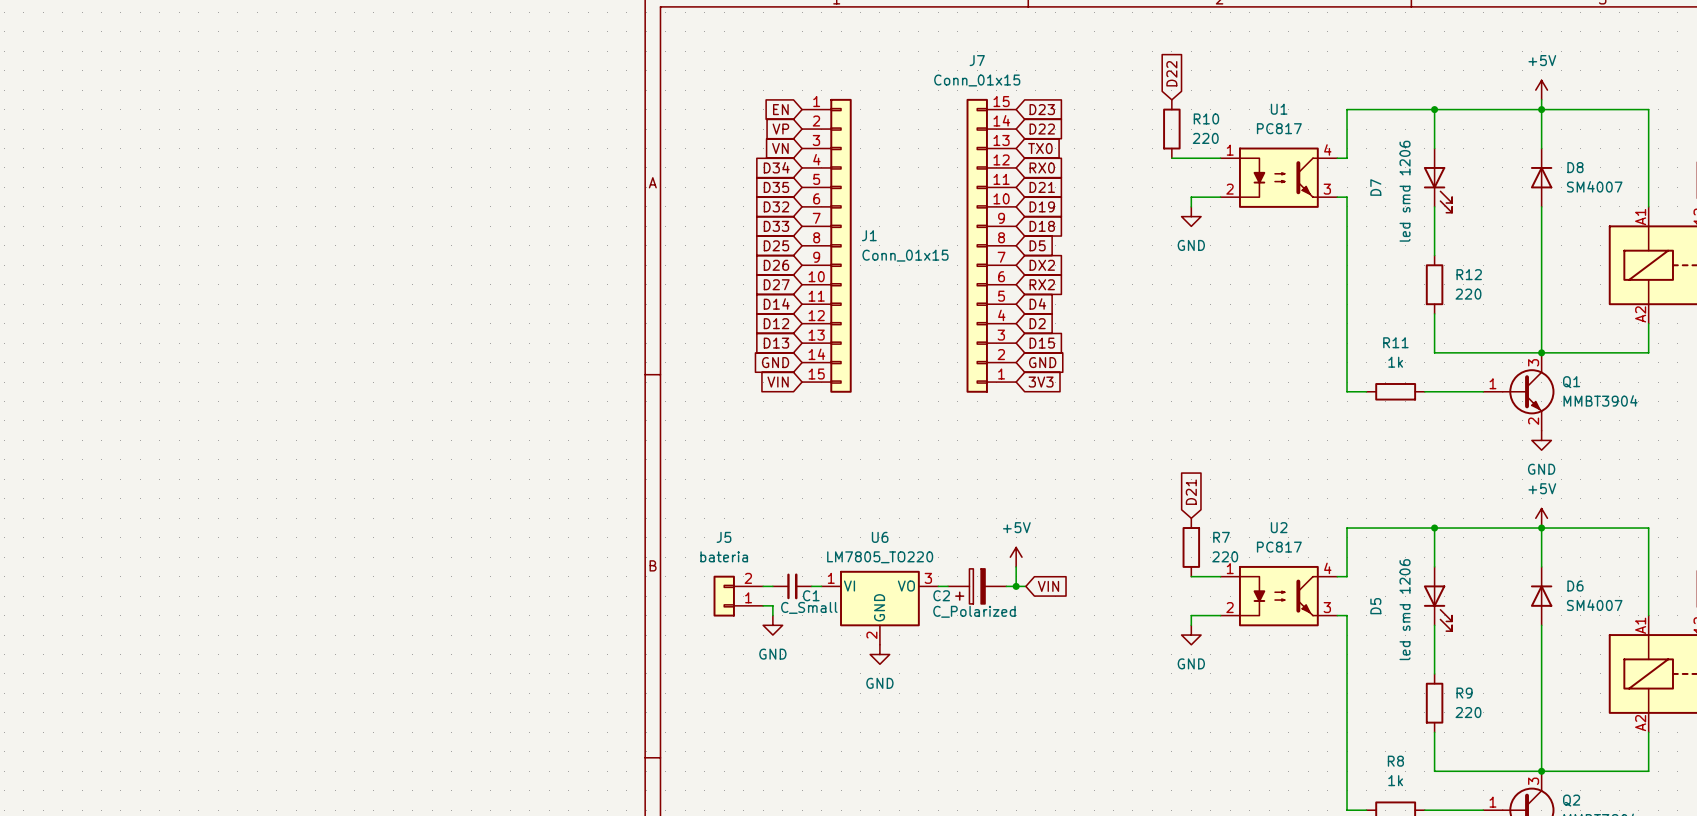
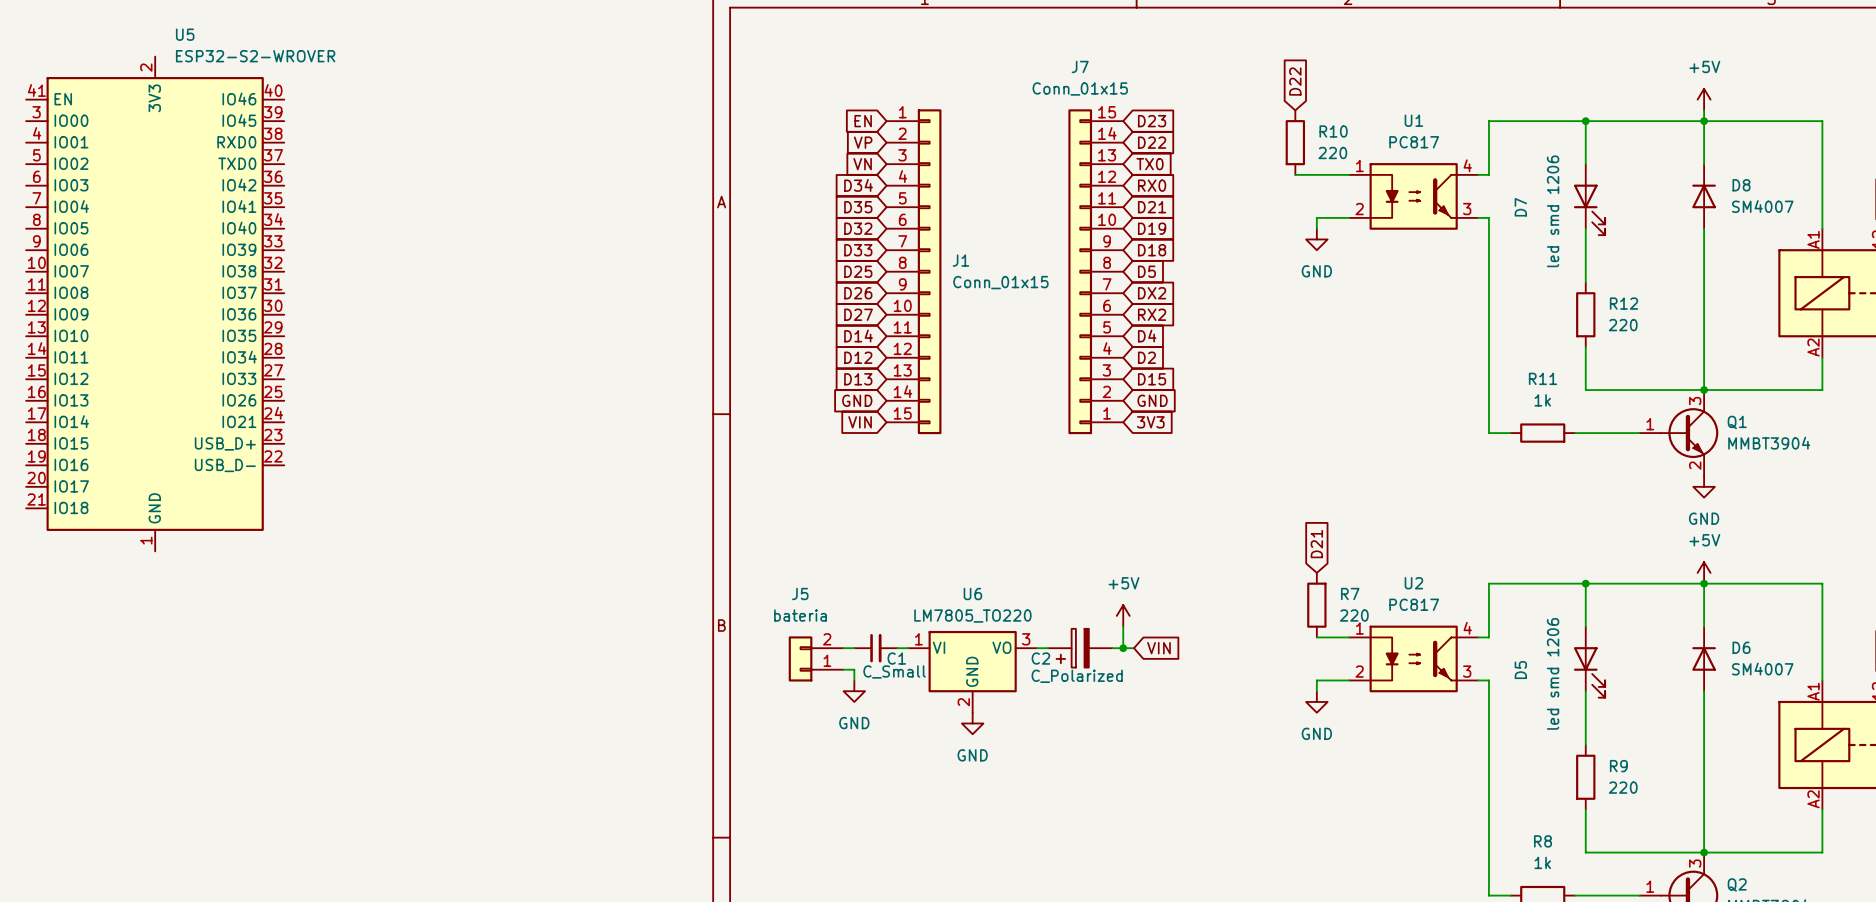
U5: none -> ESP32-S2-WROVER (155, 303)

